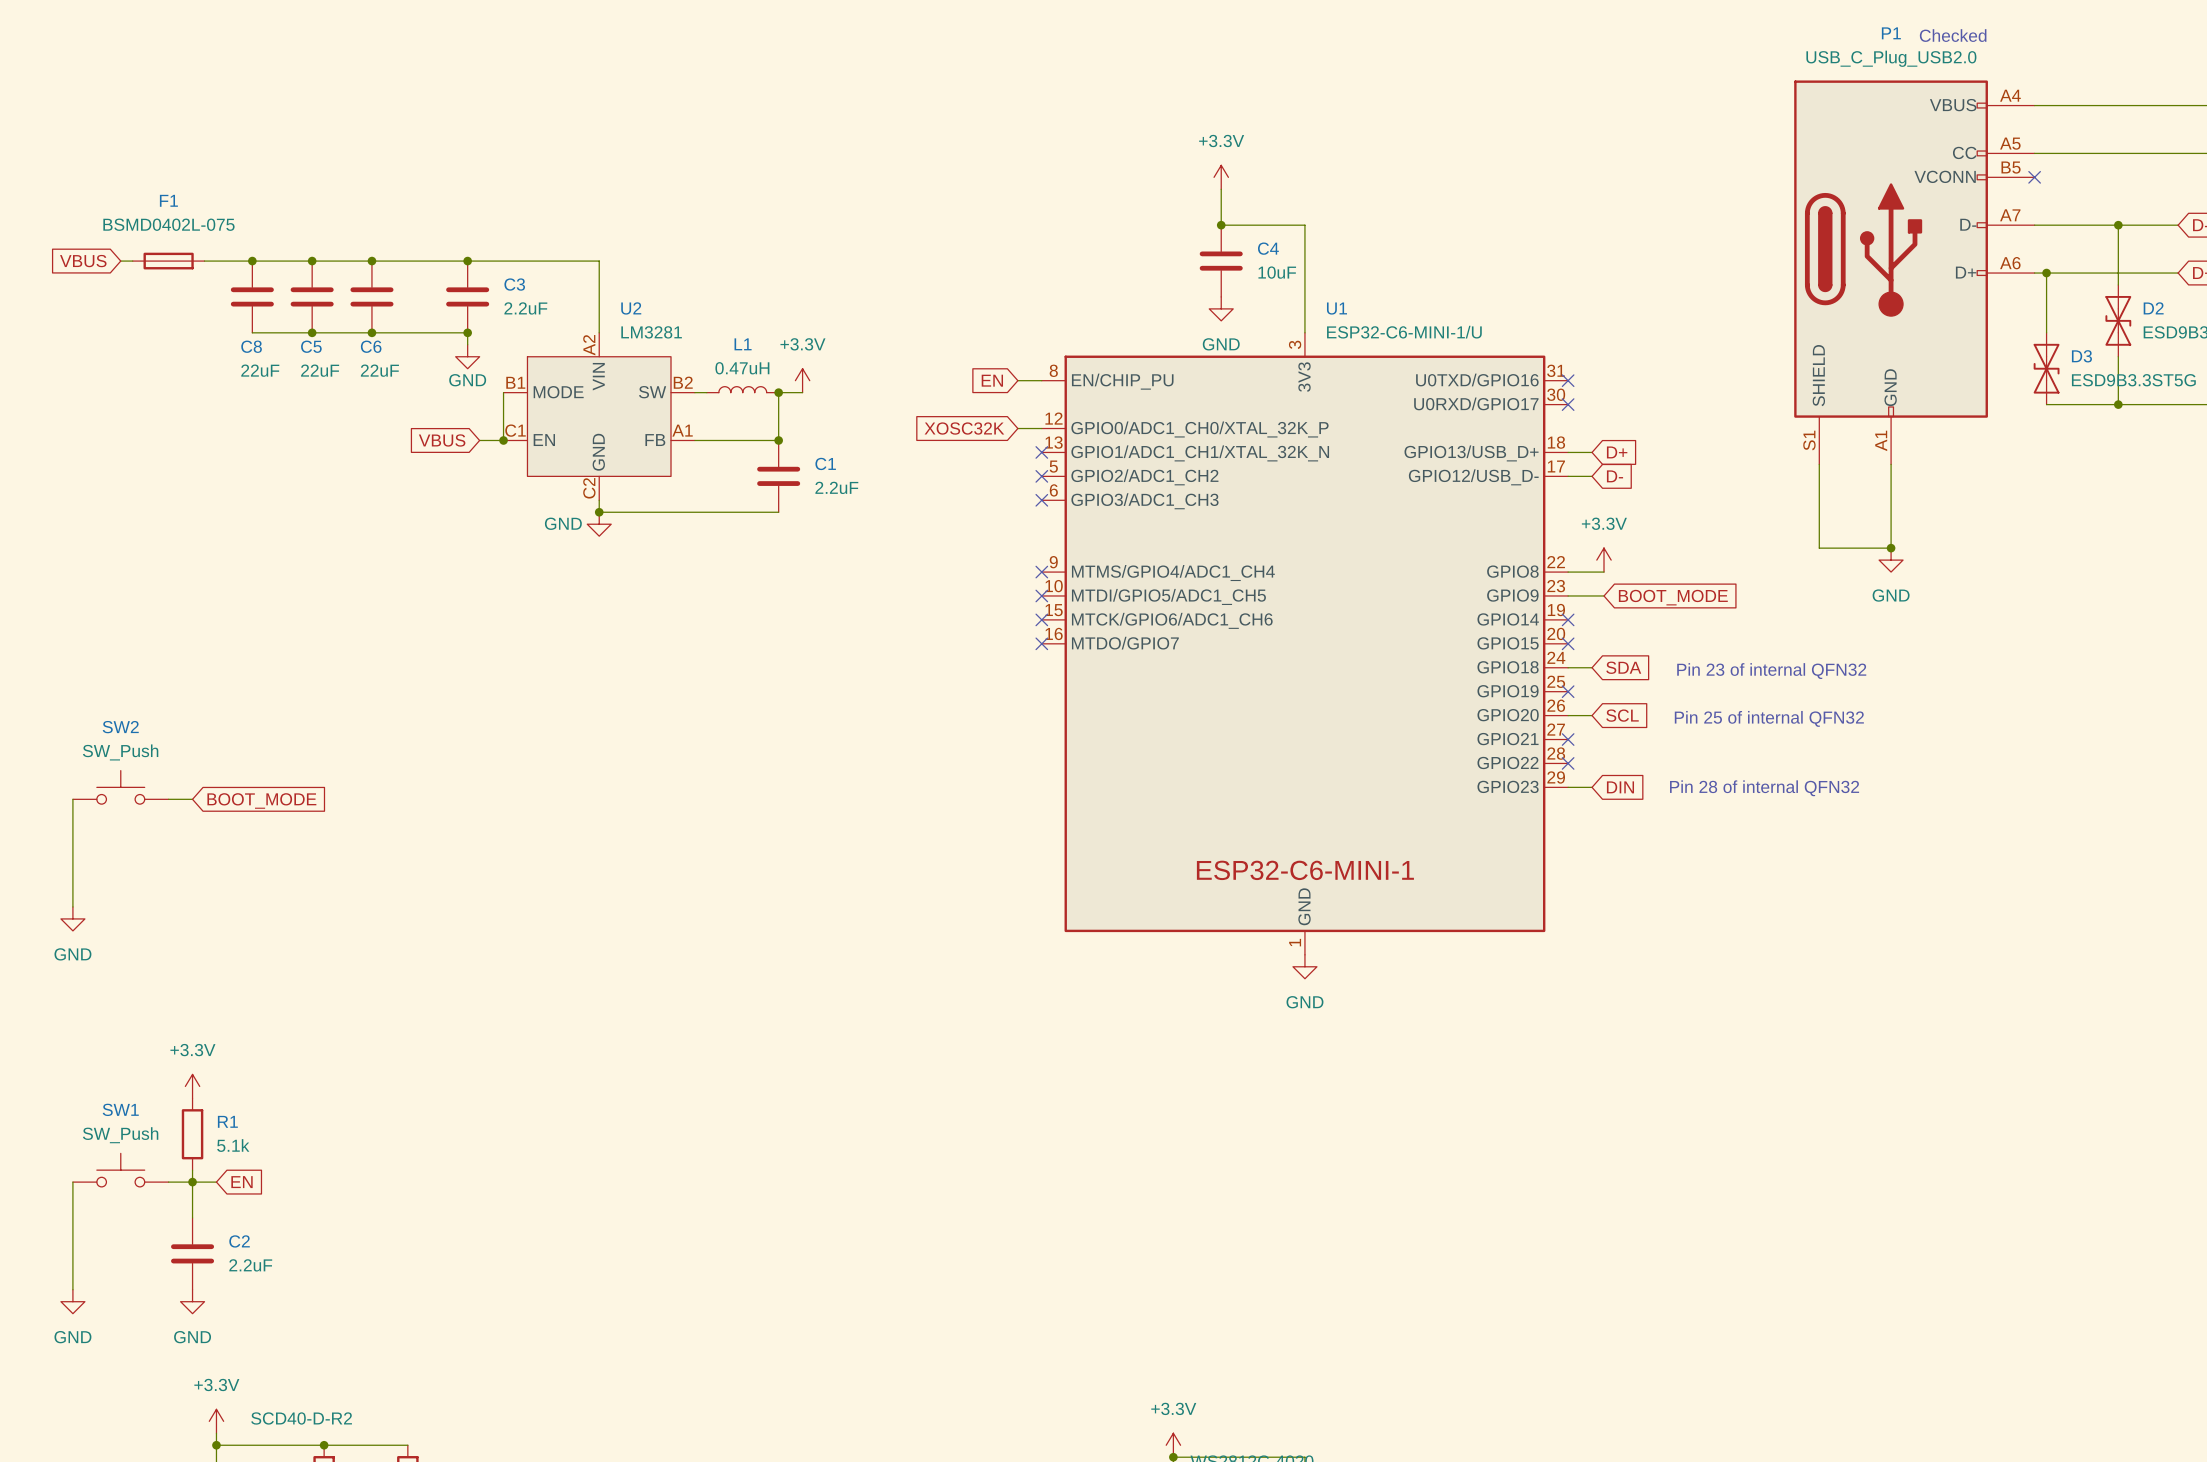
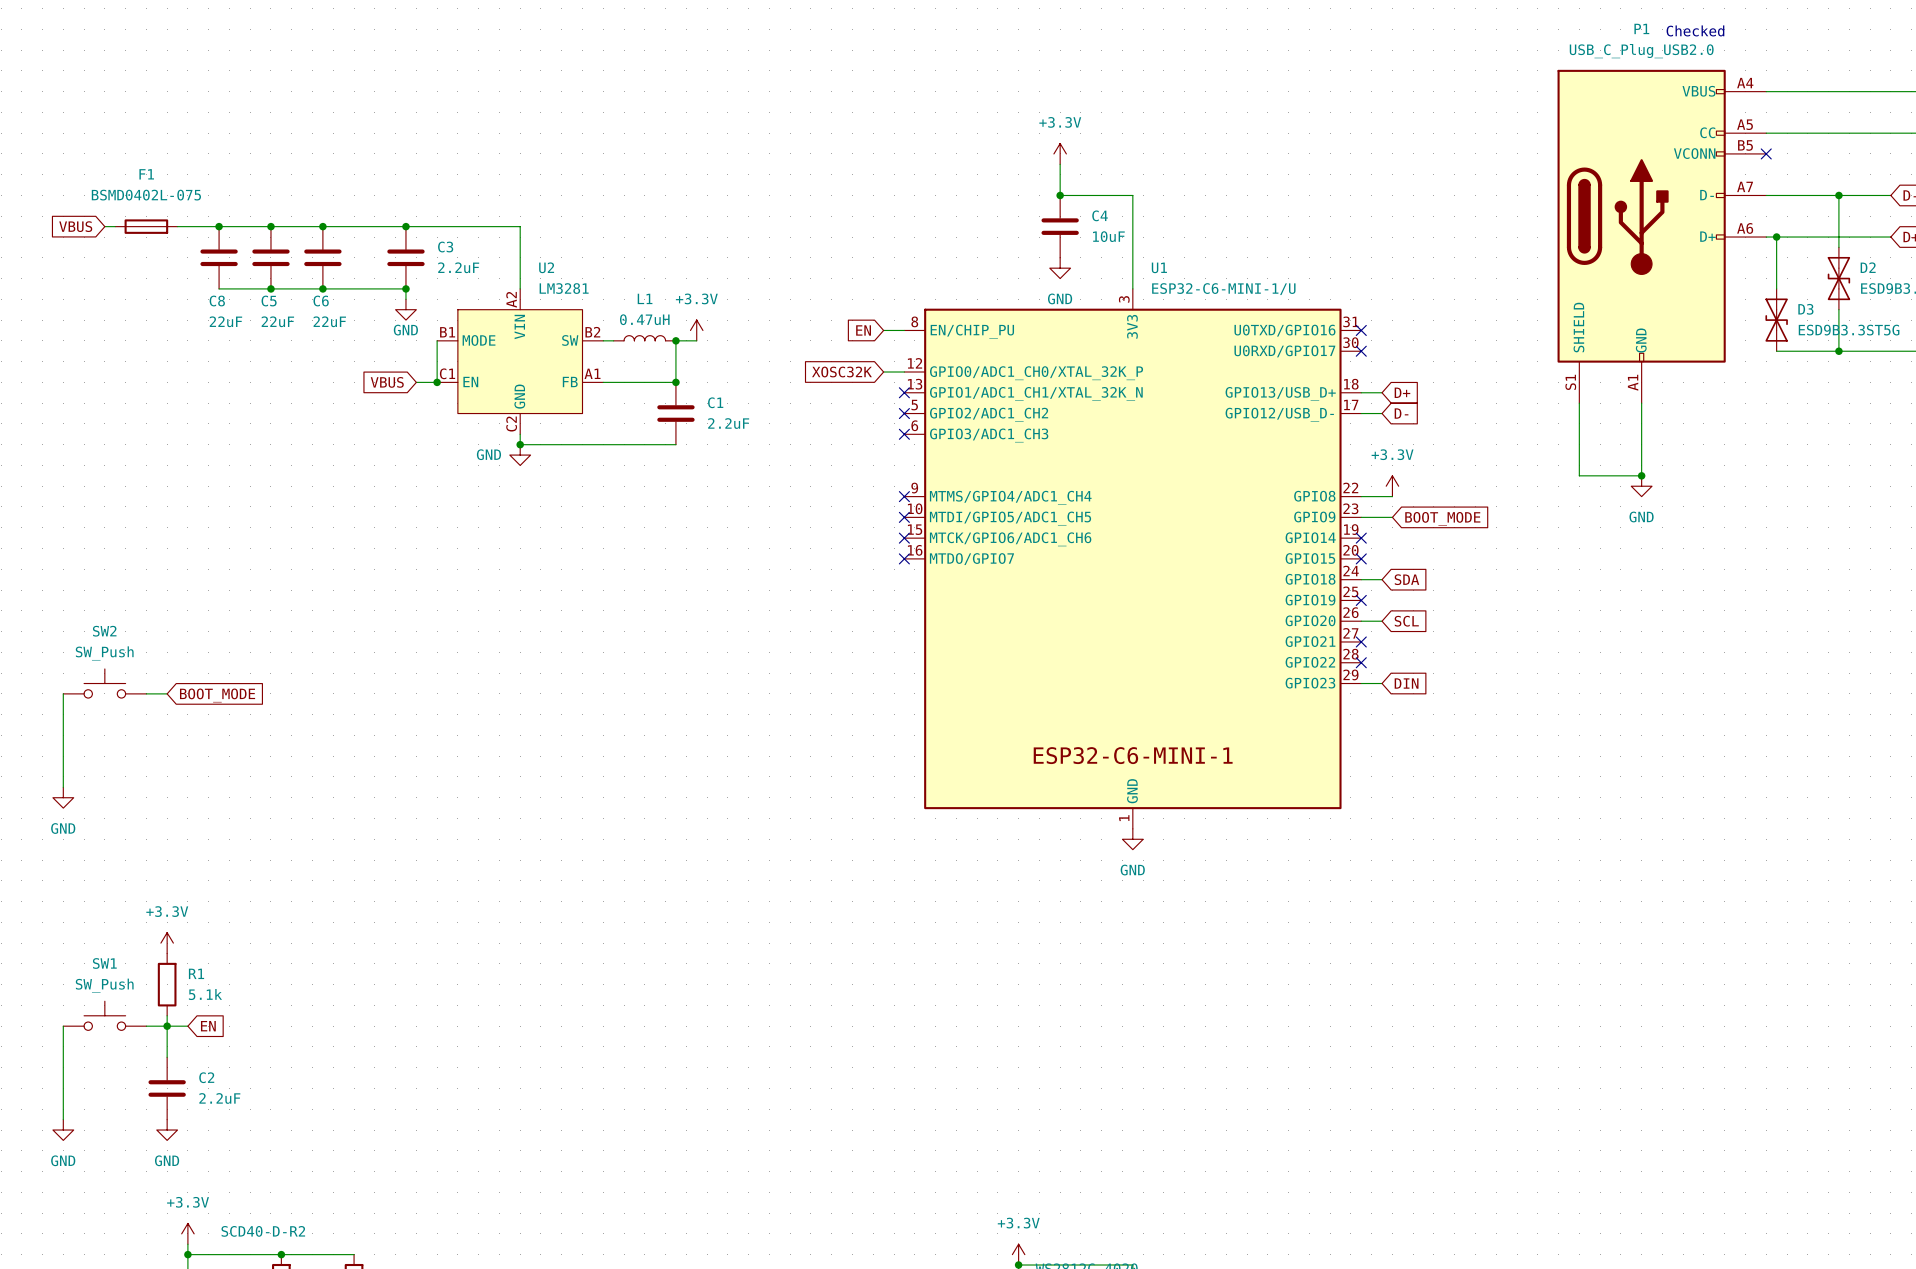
text: Pin 23 of internal QFN32 (1771, 671) -> none
text: Pin 25 of internal QFN32 (1769, 718) -> none
text: Pin 28 of internal QFN32 (1764, 788) -> none

